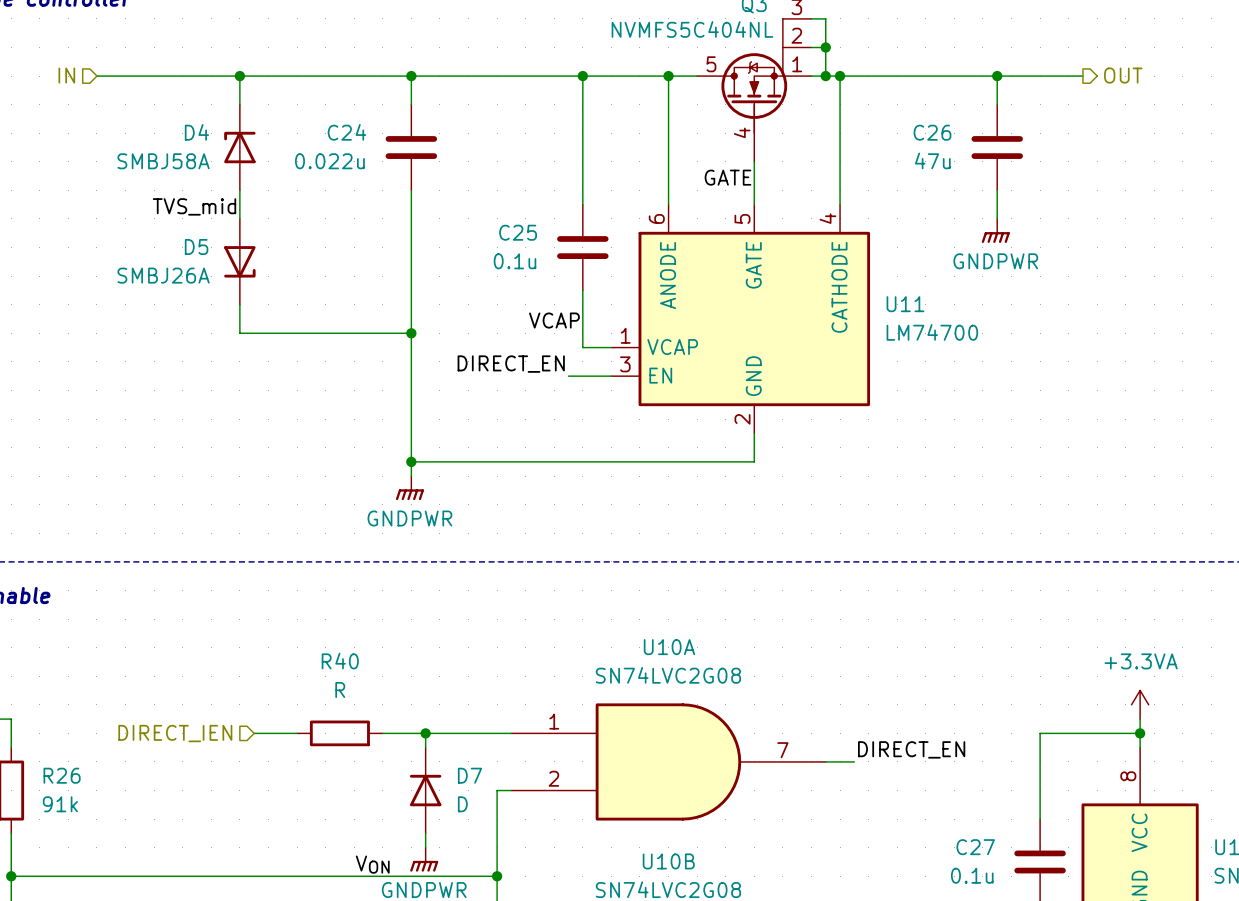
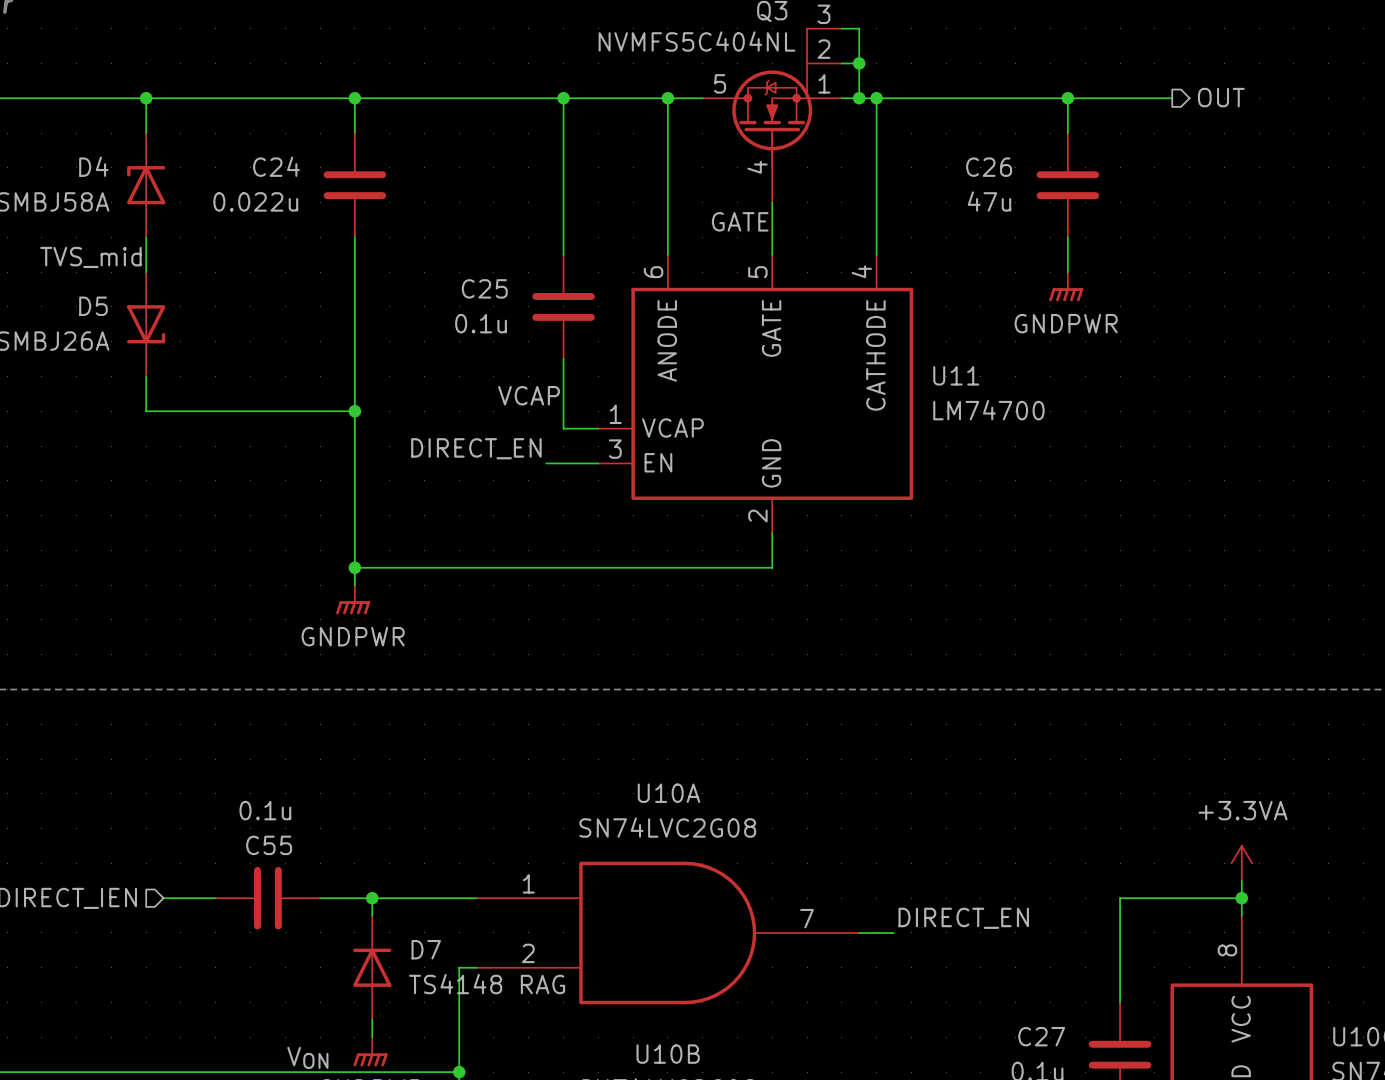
R40: R (339, 733) -> none
C55: none -> 0.1u (267, 898)
D7 value: D (462, 804) -> TS4148 RAG (487, 984)

